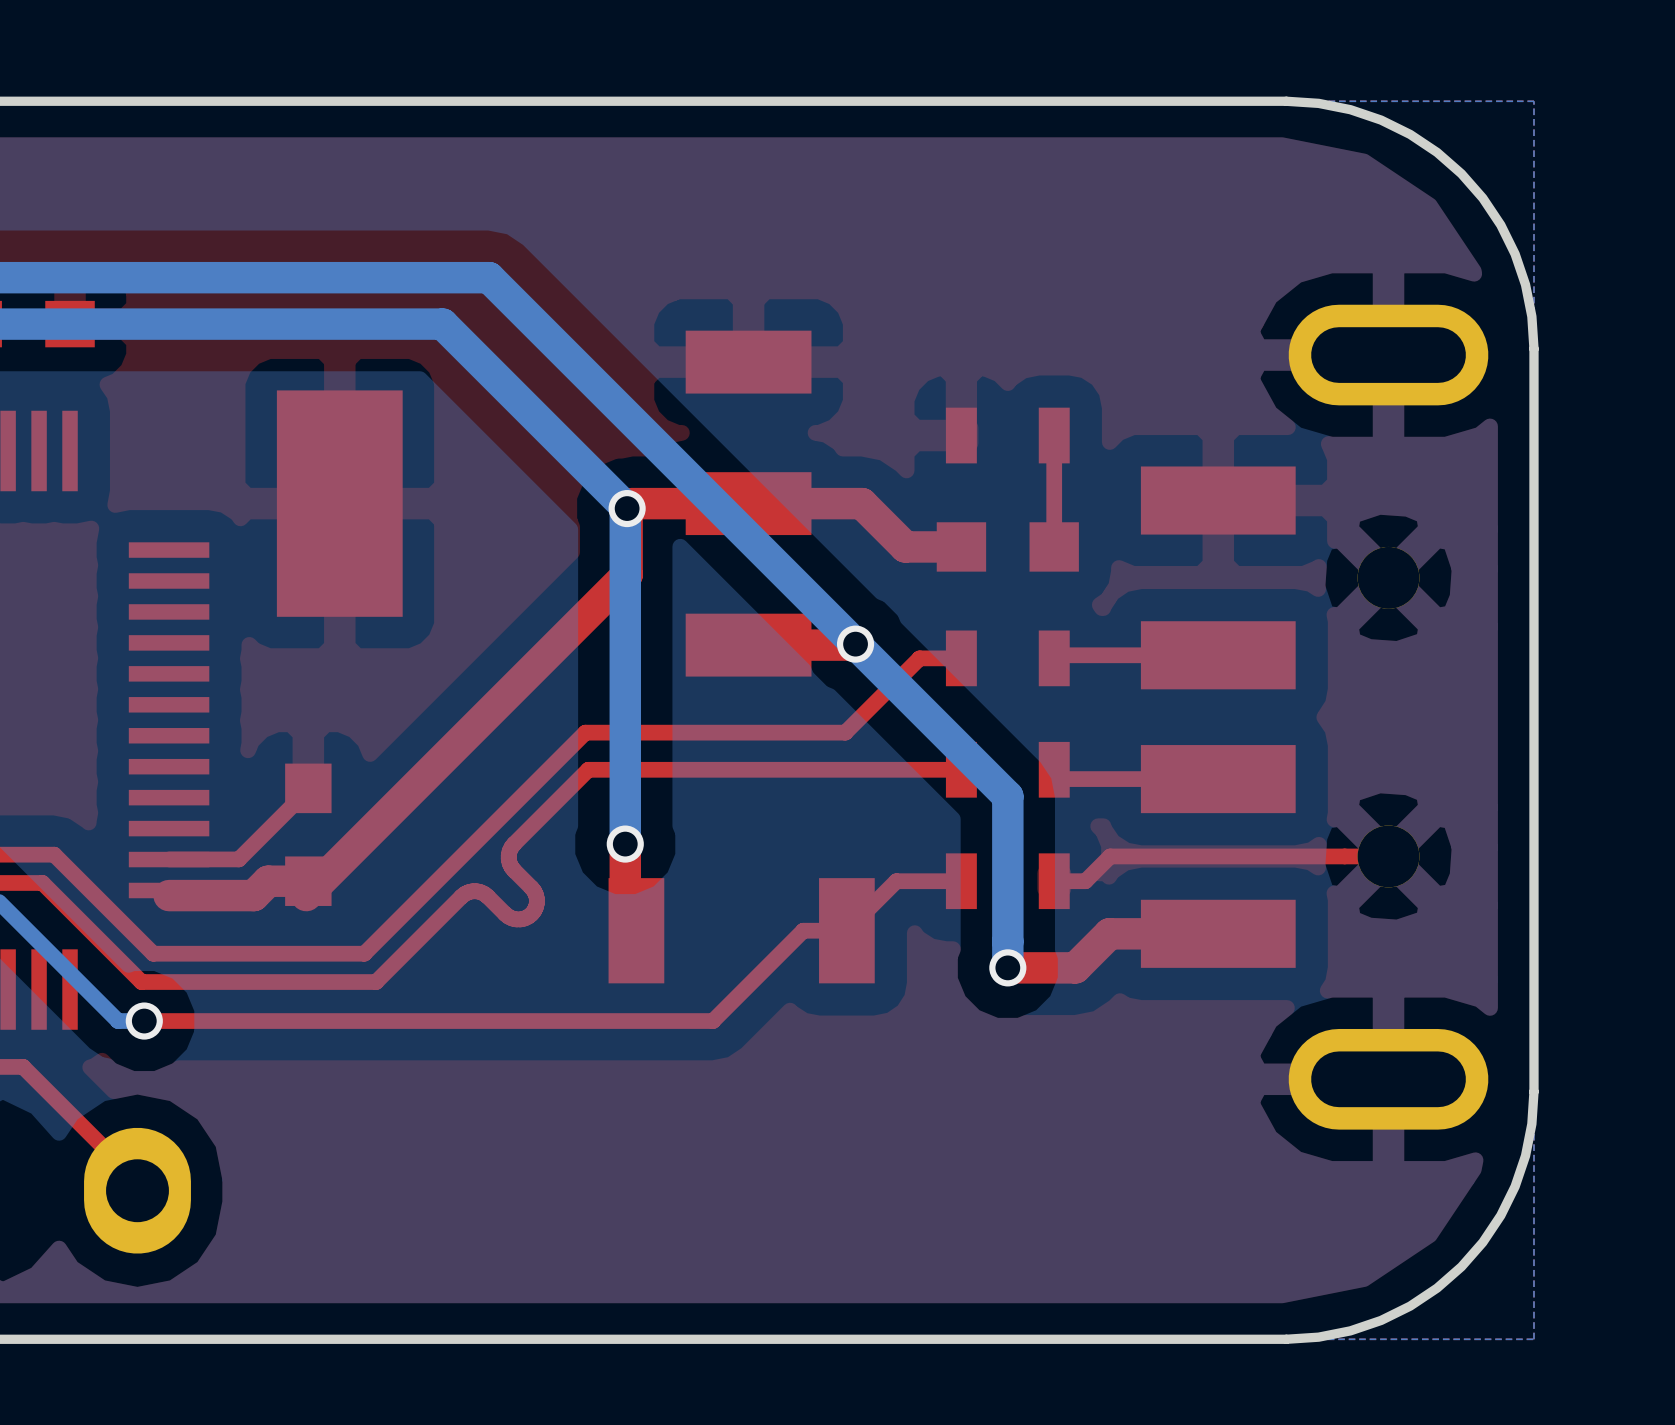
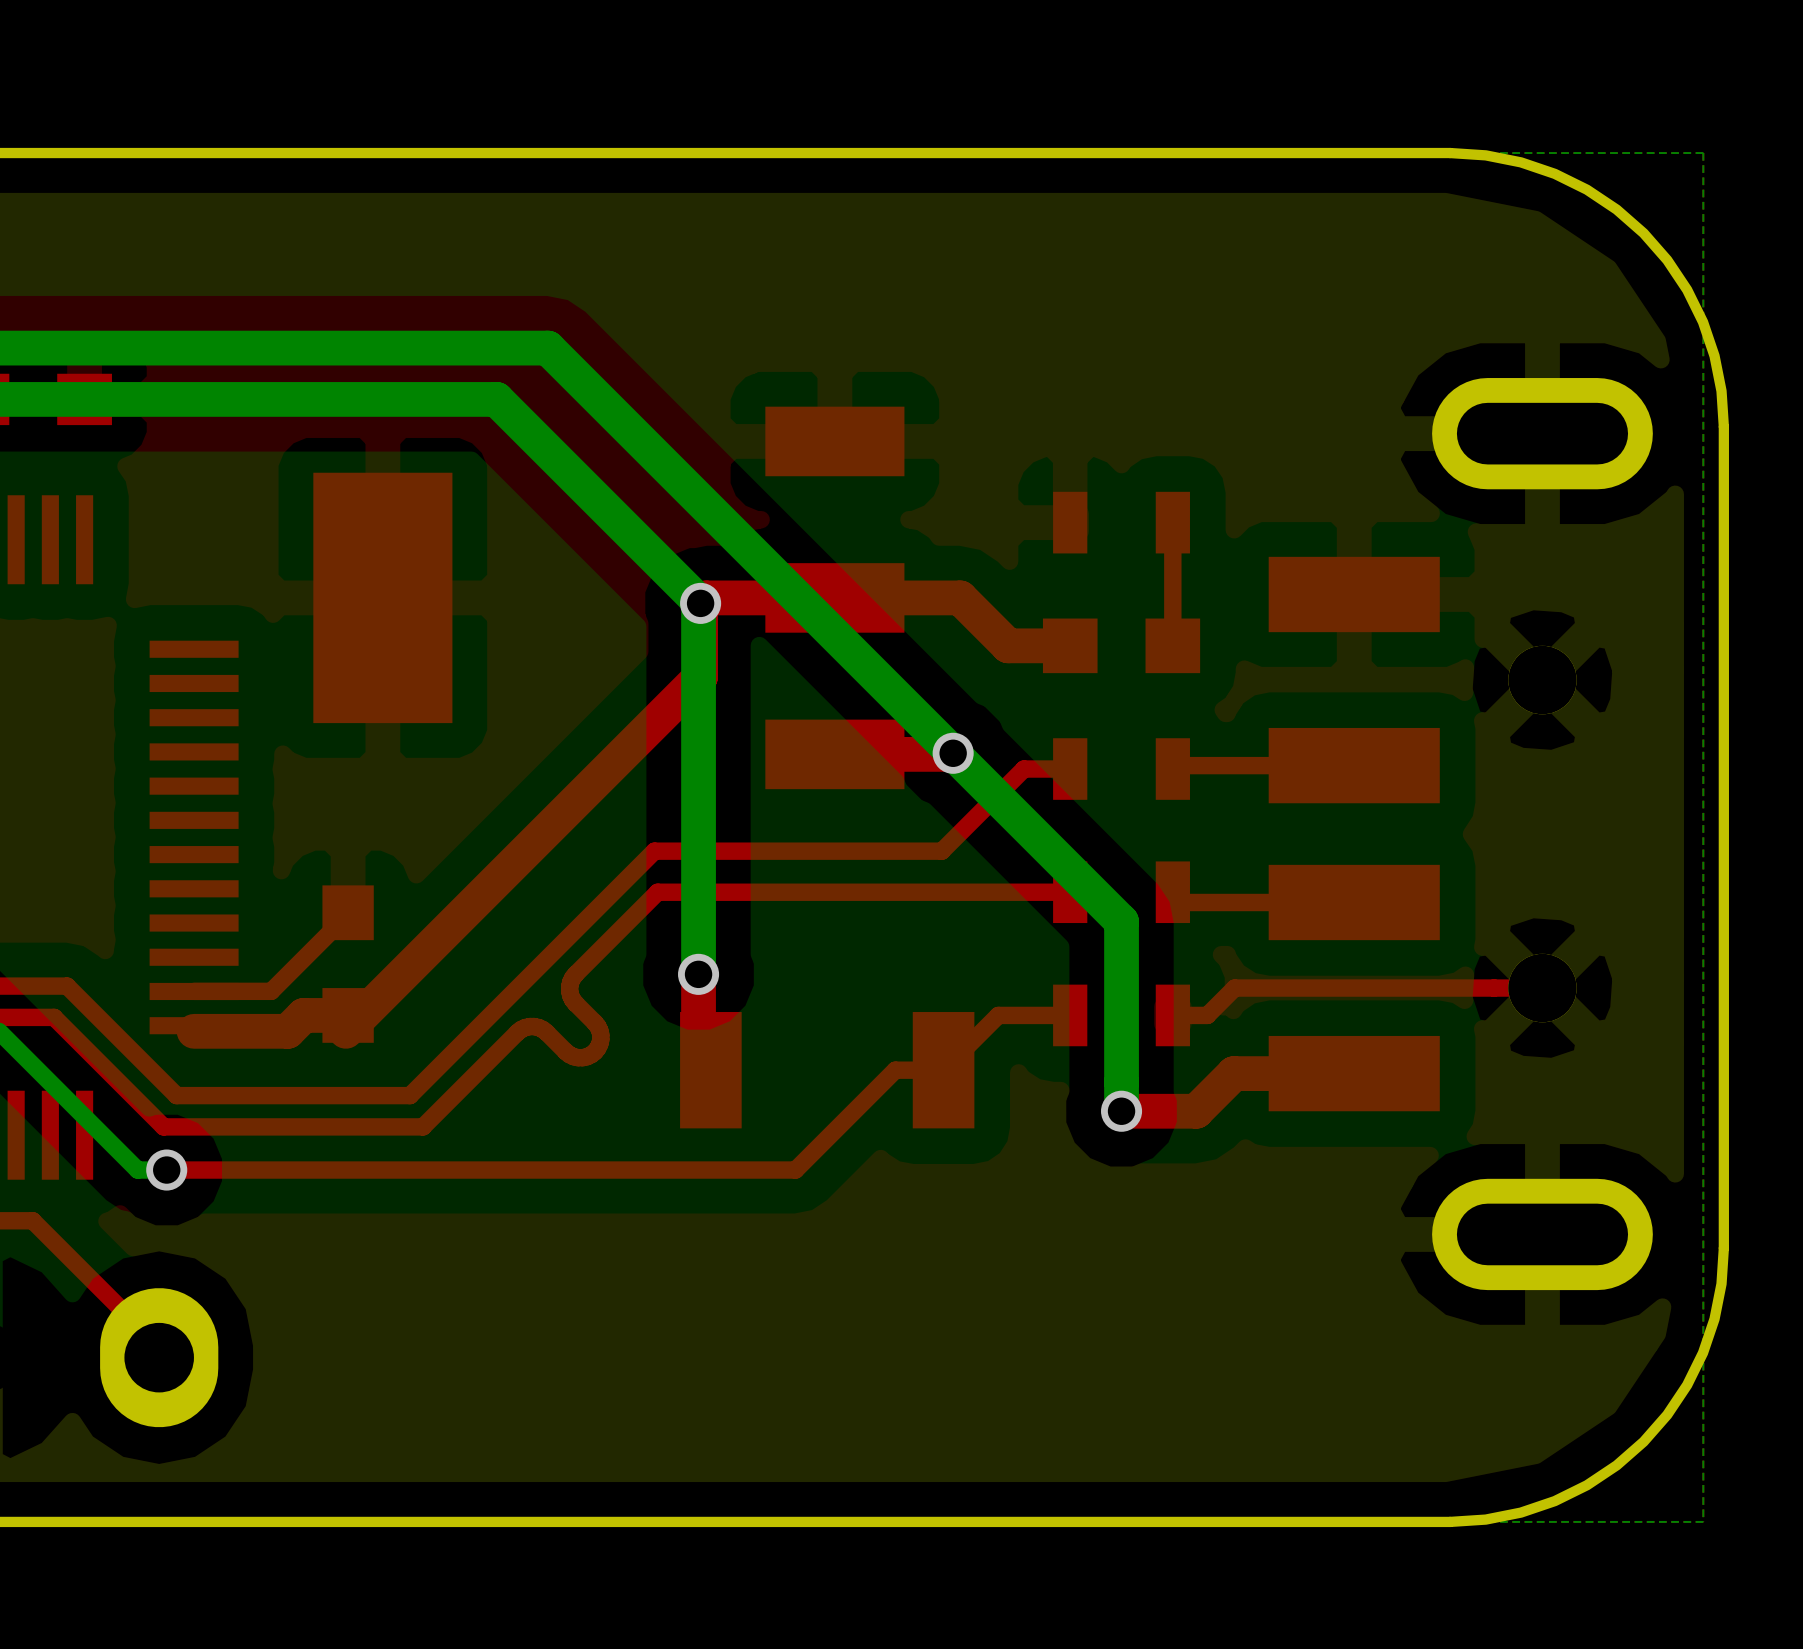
board edge: (1286, 101) (1318, 103) (1350, 109) (1381, 120) (1410, 134) (1437, 152) (1461, 173) (1482, 198) (1500, 225) (1515, 254) (1525, 284) (1531, 316) (1533, 348) (1533, 1091) (1531, 1123) (1525, 1155) (1515, 1186) (1500, 1215) (1482, 1242) (1461, 1266) (1437, 1288) (1410, 1306) (1381, 1320) (1350, 1330) (1318, 1337) (1286, 1339) -> (1429, 153) (1485, 155) (1520, 162) (1554, 173) (1586, 189) (1616, 209) (1643, 233) (1667, 260) (1687, 289) (1703, 322) (1714, 355) (1721, 391) (1723, 426) (1723, 1248) (1721, 1283) (1714, 1319) (1703, 1352) (1687, 1385) (1667, 1414) (1643, 1441) (1616, 1465) (1586, 1485) (1554, 1501) (1520, 1512) (1485, 1519) (1429, 1521)

